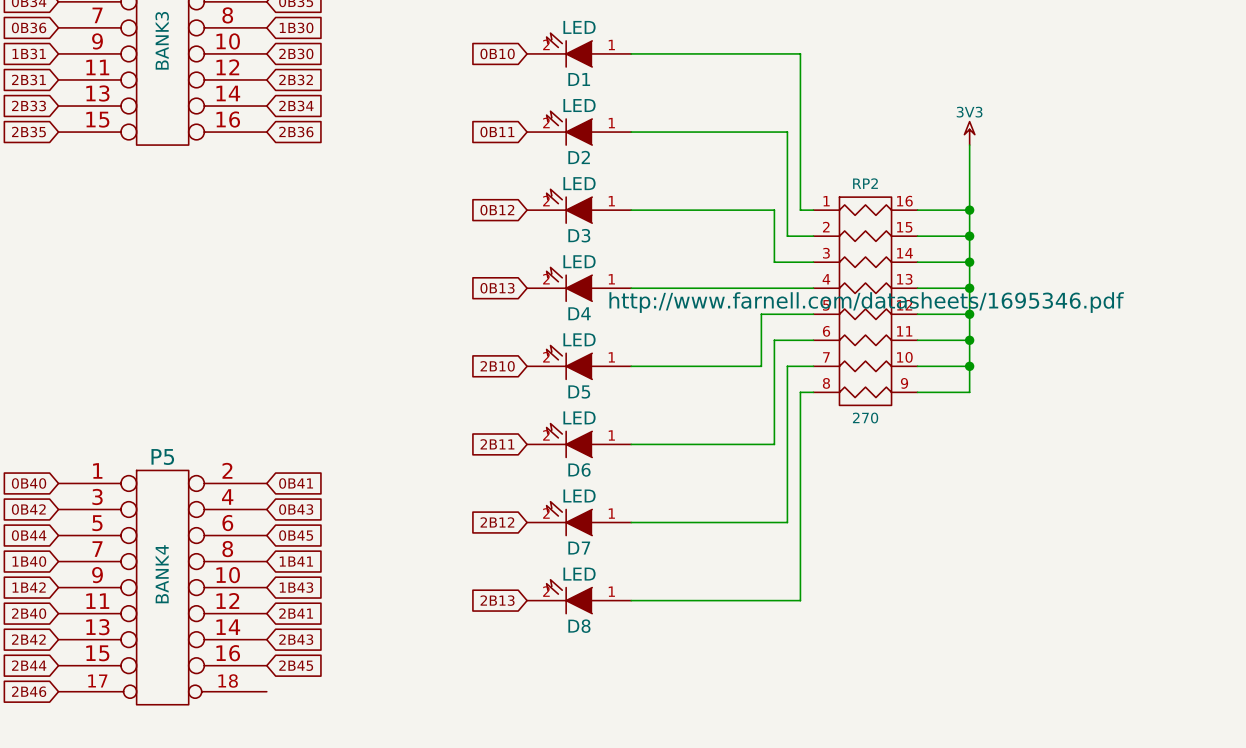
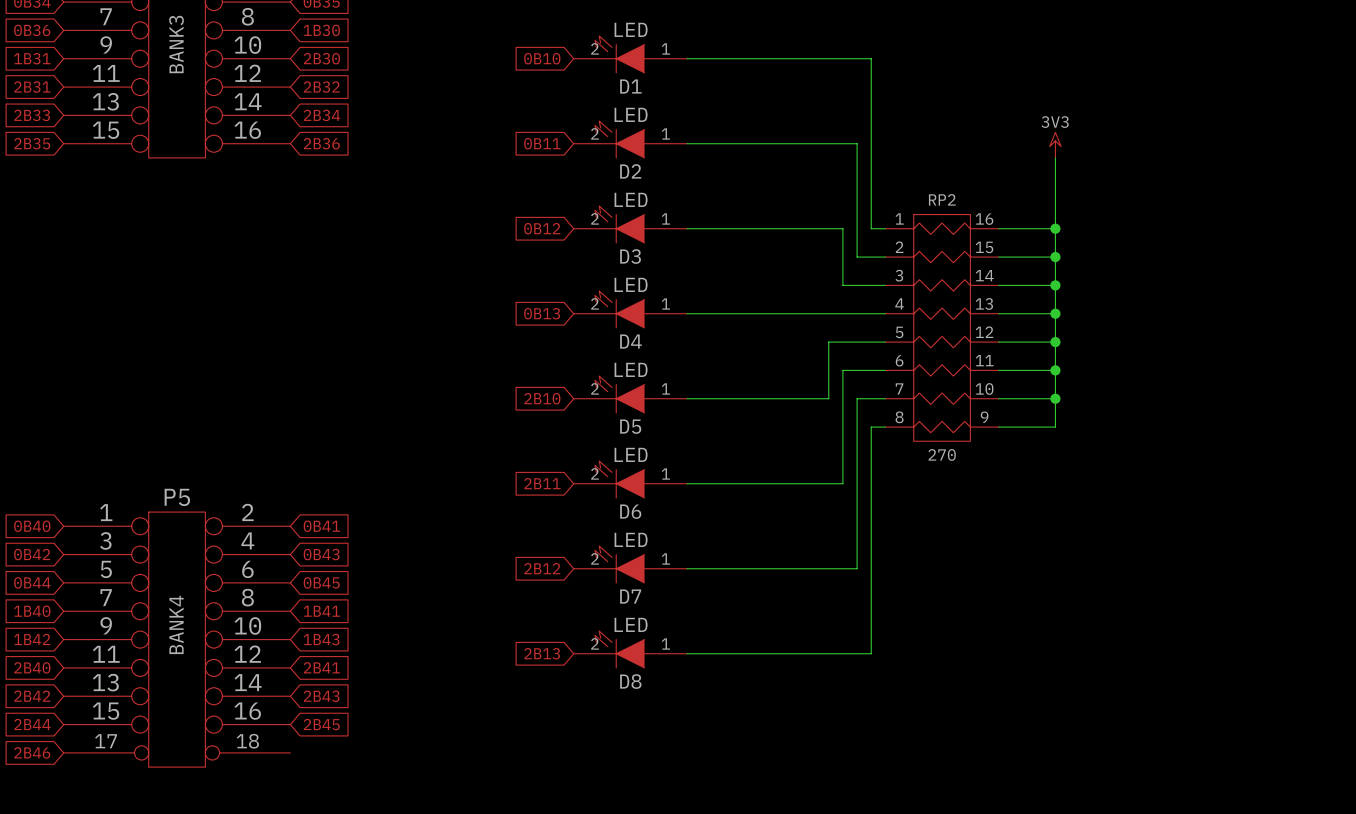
RP2 text: http://www.farnell.com/datasheets/1695346.pdf (866, 302) -> none

